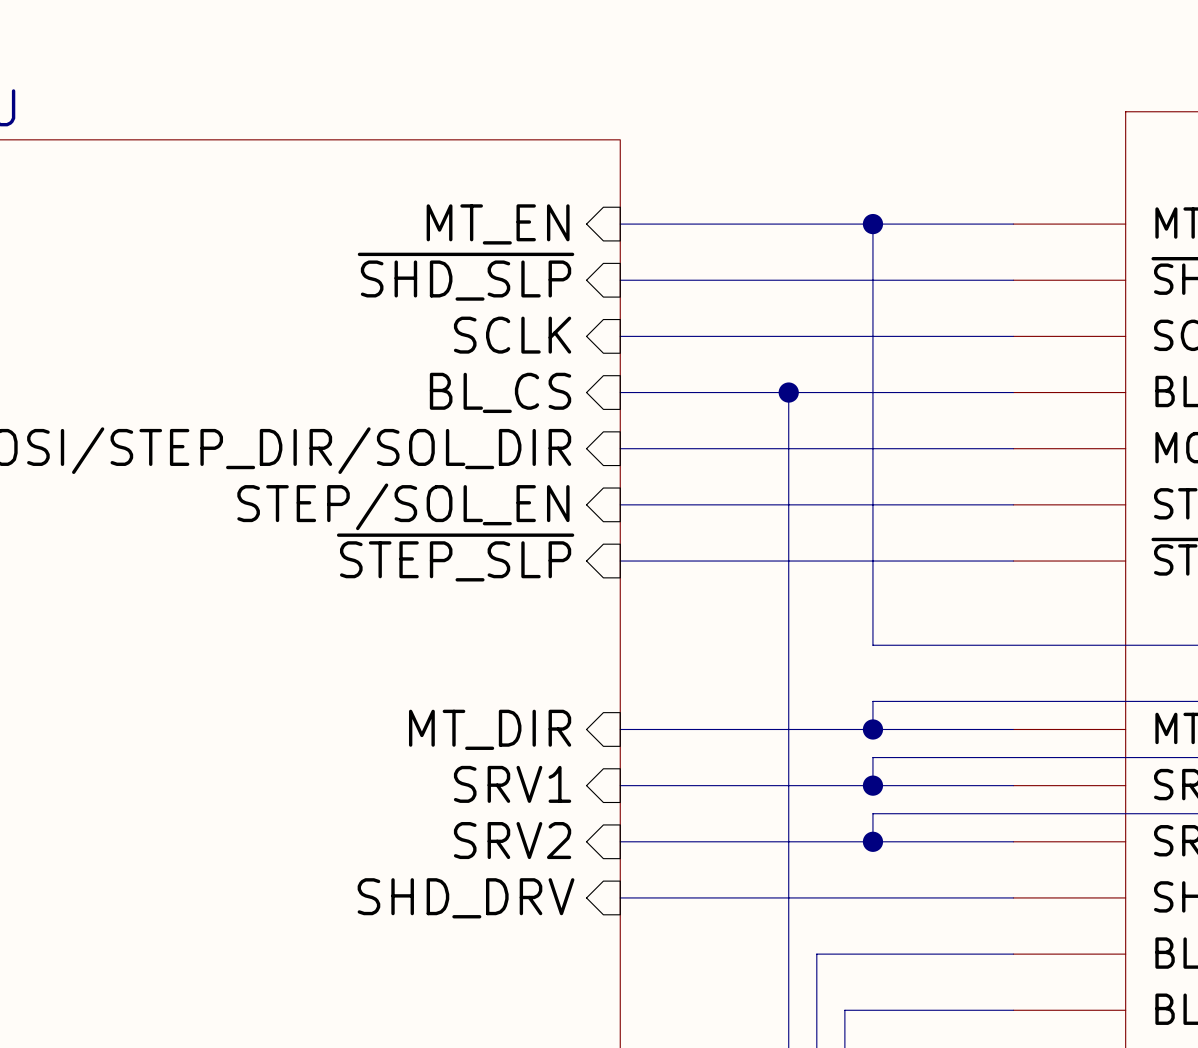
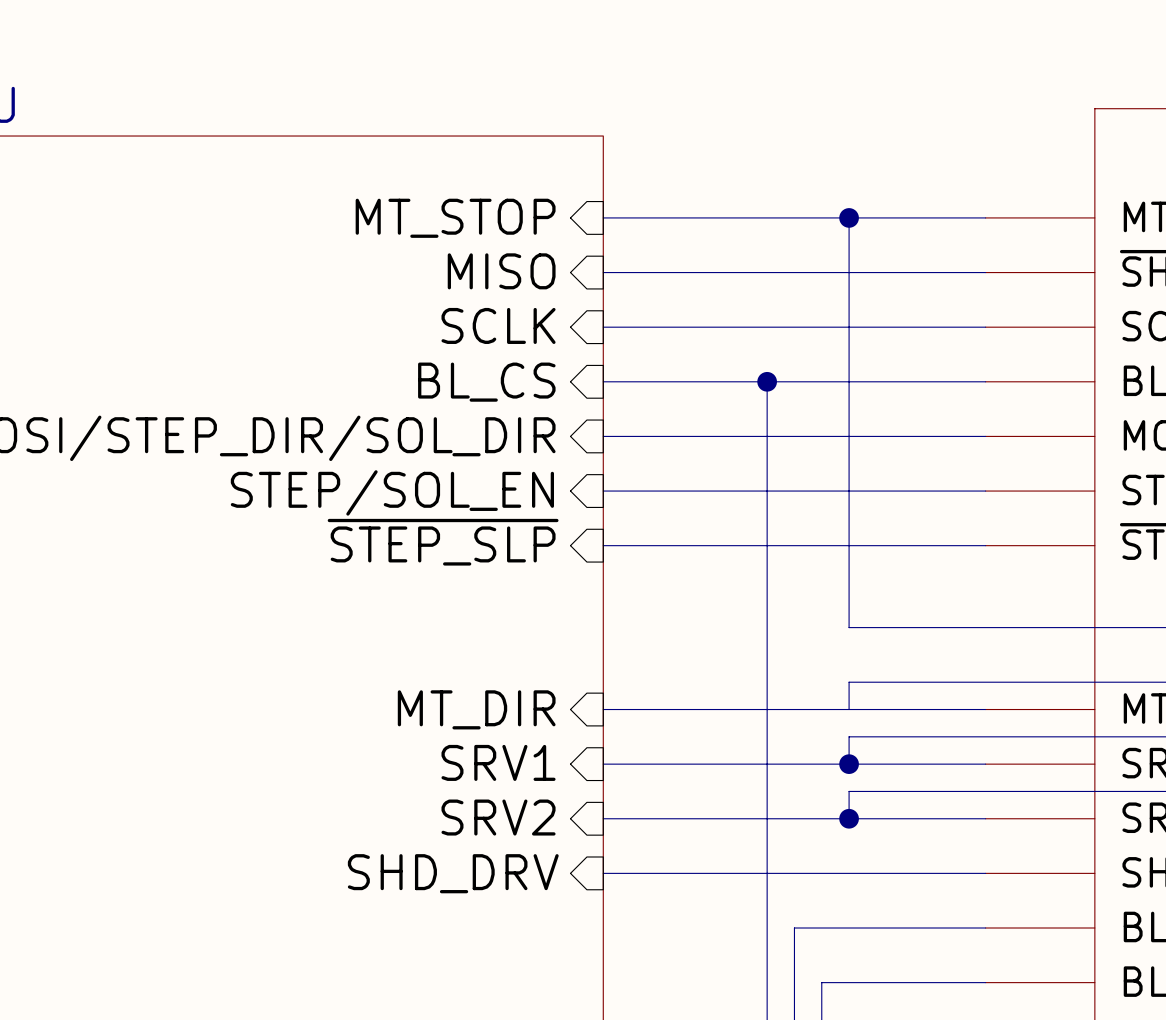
sheet pin: MT_EN (498, 224) -> MT_STOP (455, 218)
sheet pin: ~{SHD_SLP} (466, 276) -> MISO (501, 271)
junction: (872, 729) -> none

